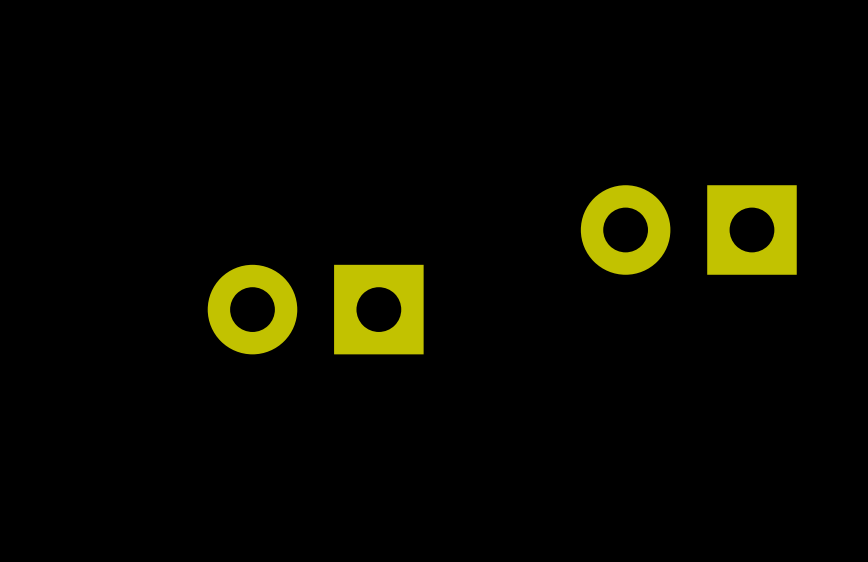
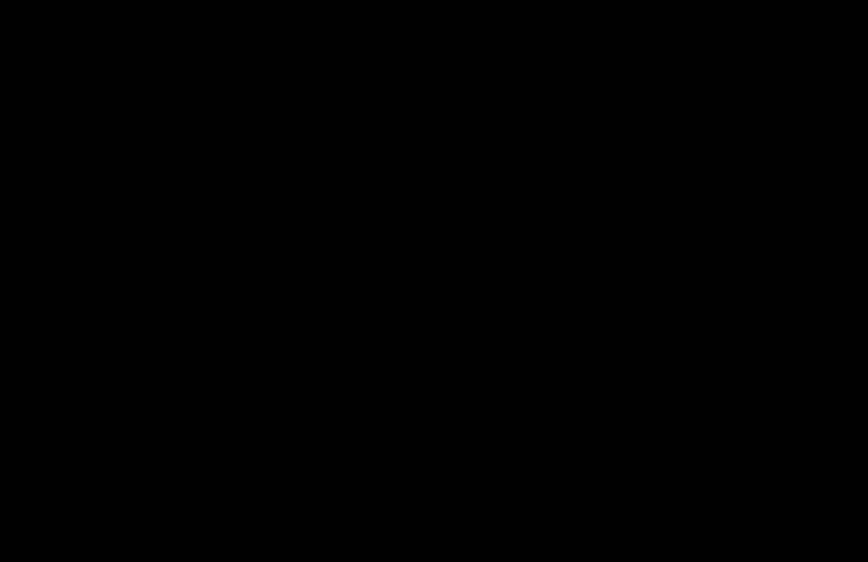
part: (688, 229) -> none
part: (315, 309) -> none

